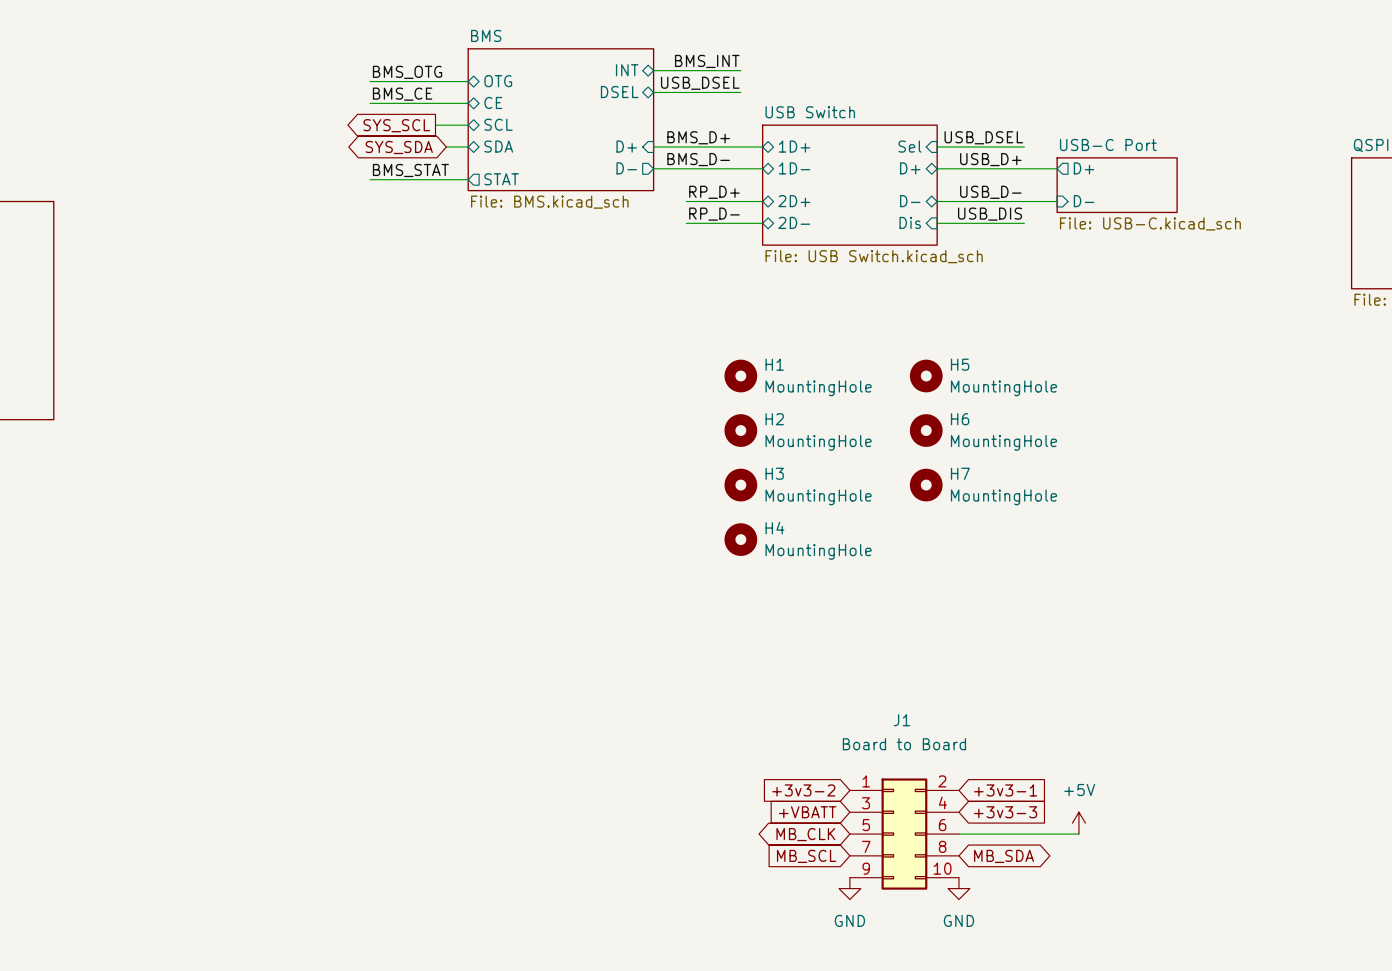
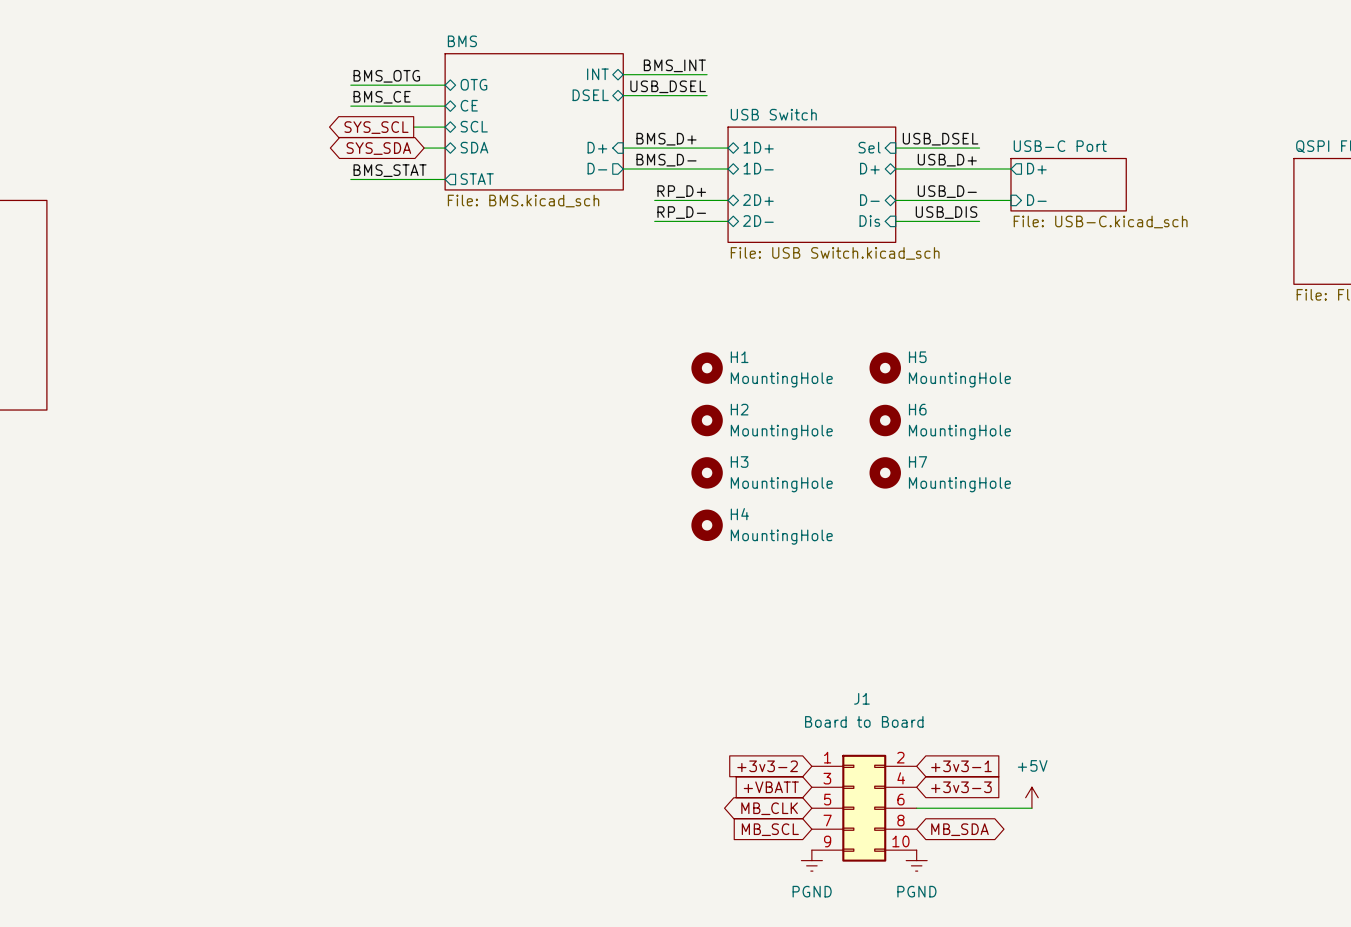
power symbol: GND (849, 888) -> PGND (811, 860)
power symbol: GND (958, 888) -> PGND (916, 860)

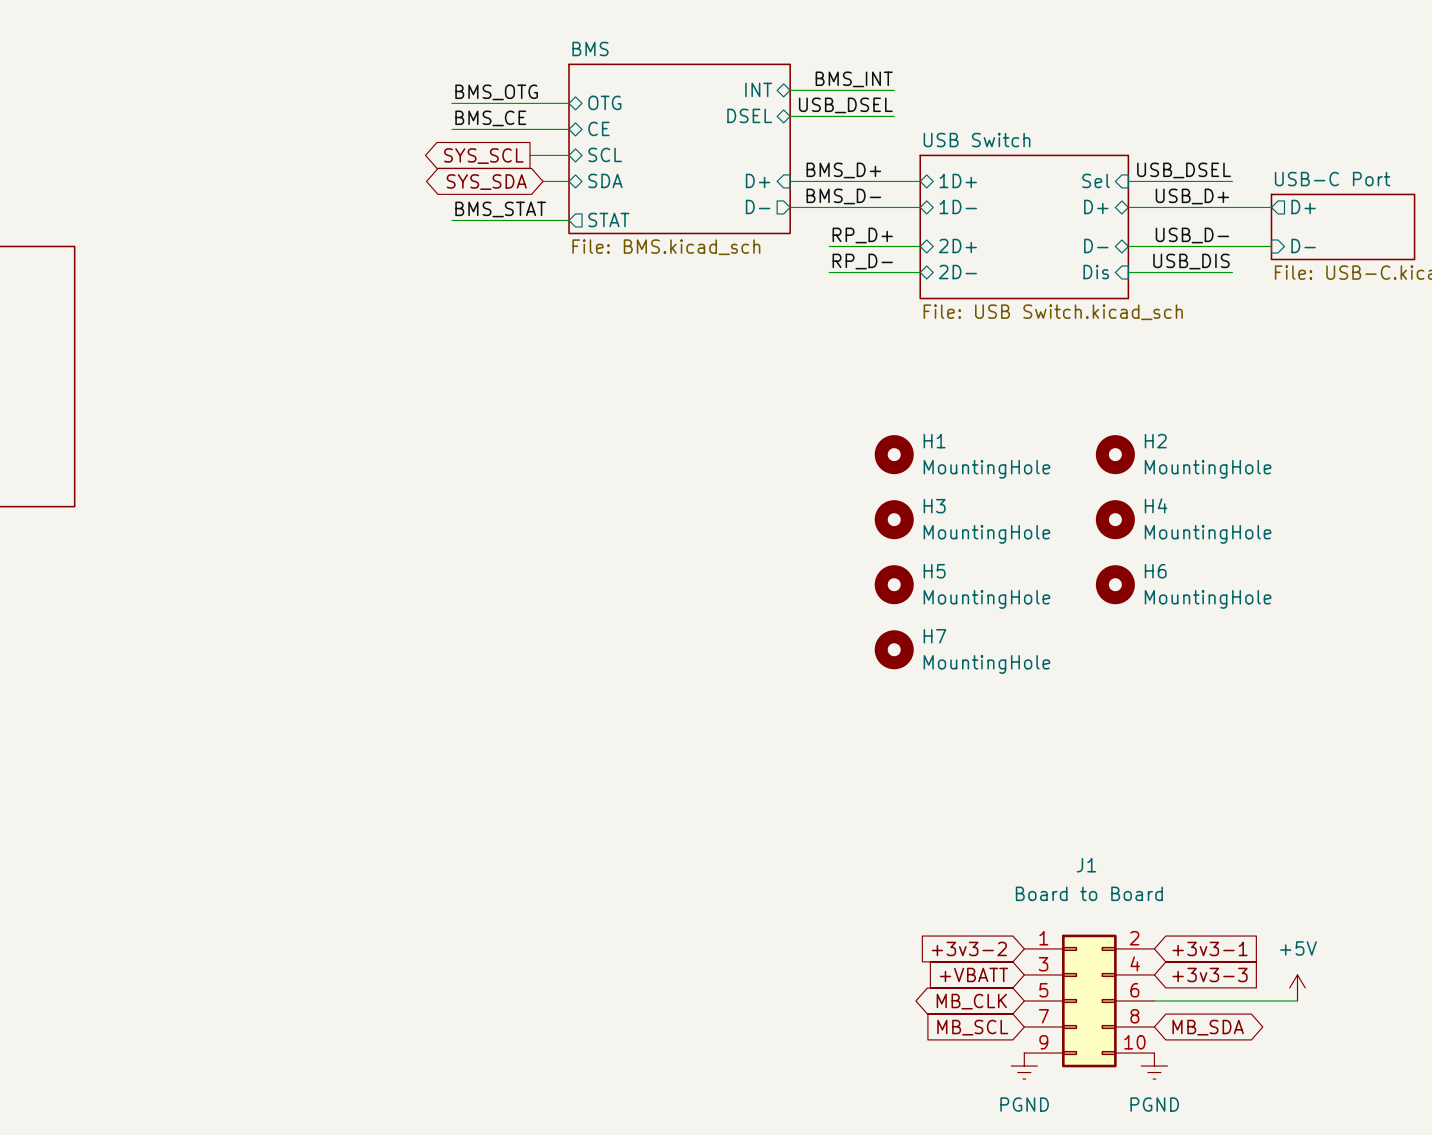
H5 name: H5 (917, 357) -> H2 (1155, 441)
H2 name: H2 (739, 409) -> H3 (934, 506)
H6 name: H6 (917, 409) -> H4 (1156, 505)
H3 name: H3 (739, 462) -> H5 (934, 571)
H7 name: H7 (918, 462) -> H6 (1155, 571)
H4 name: H4 (739, 514) -> H7 (934, 636)

